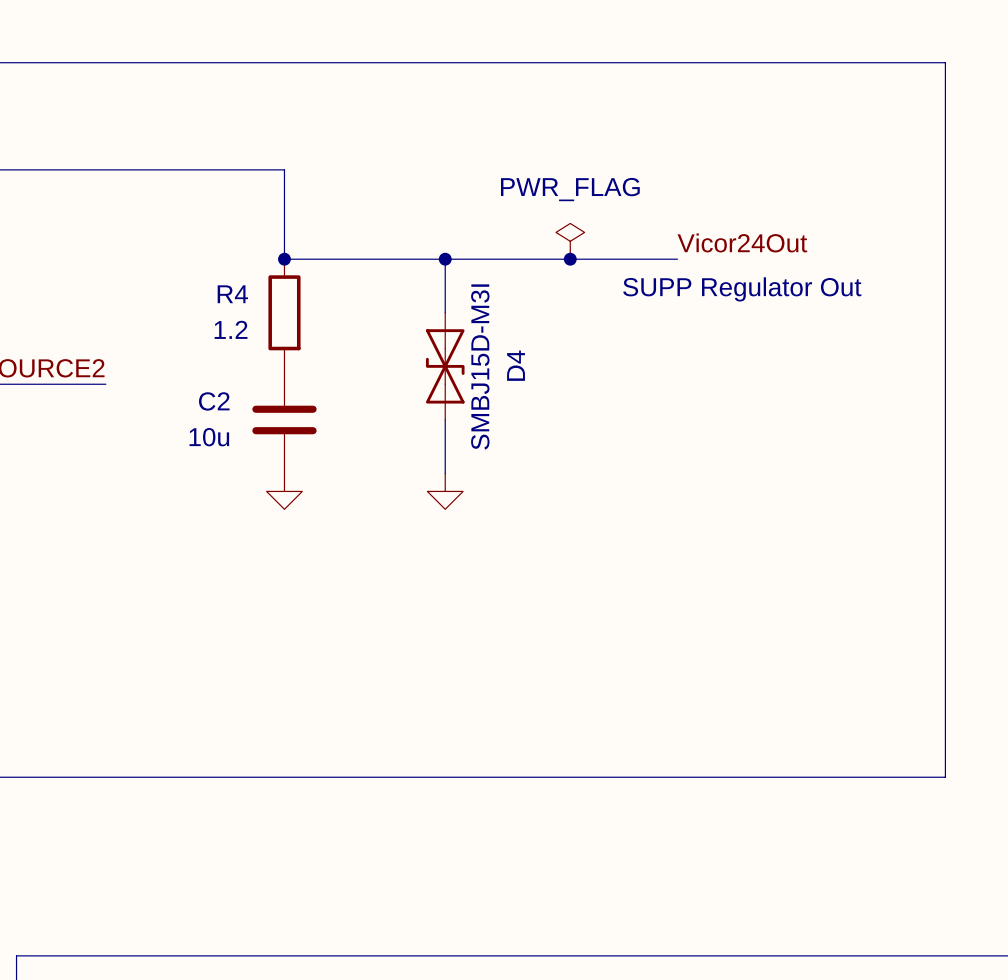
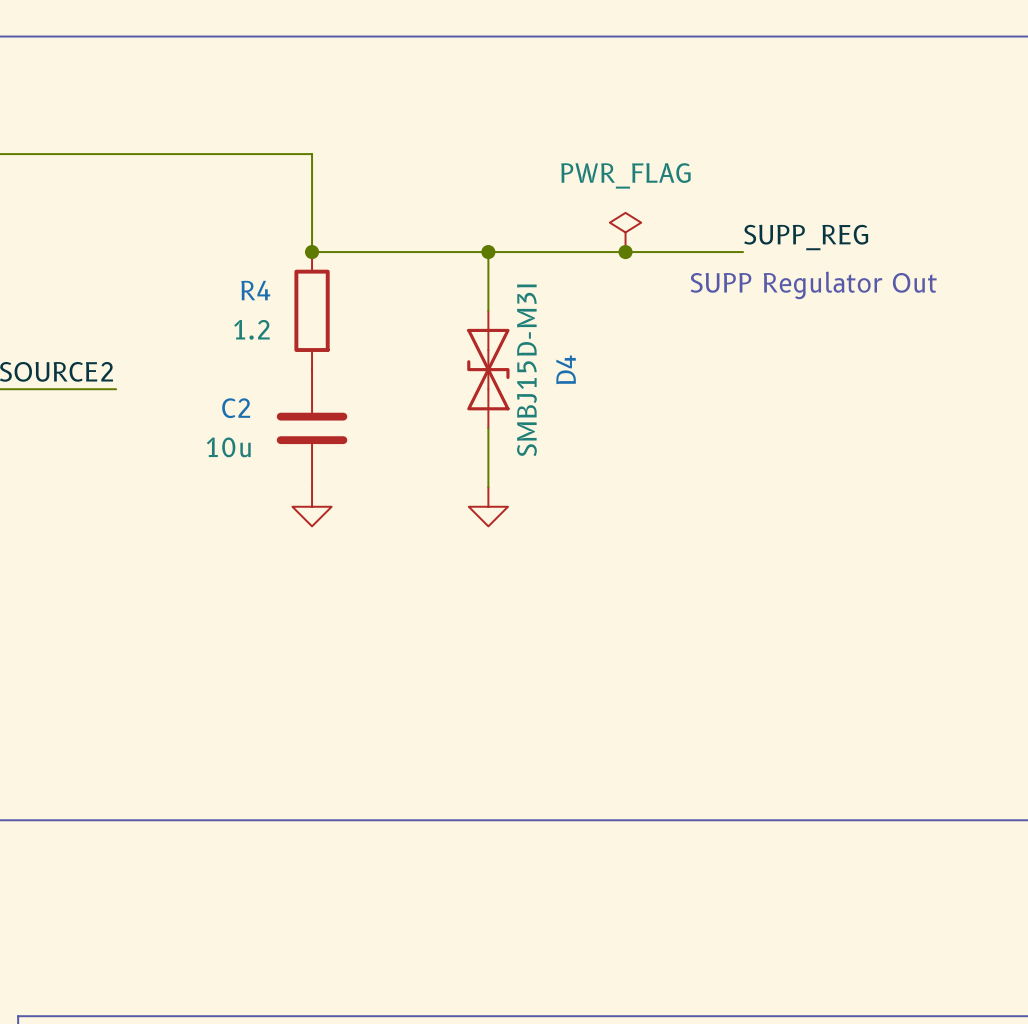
label: Vicor24Out (742, 242) -> SUPP_REG (806, 237)

